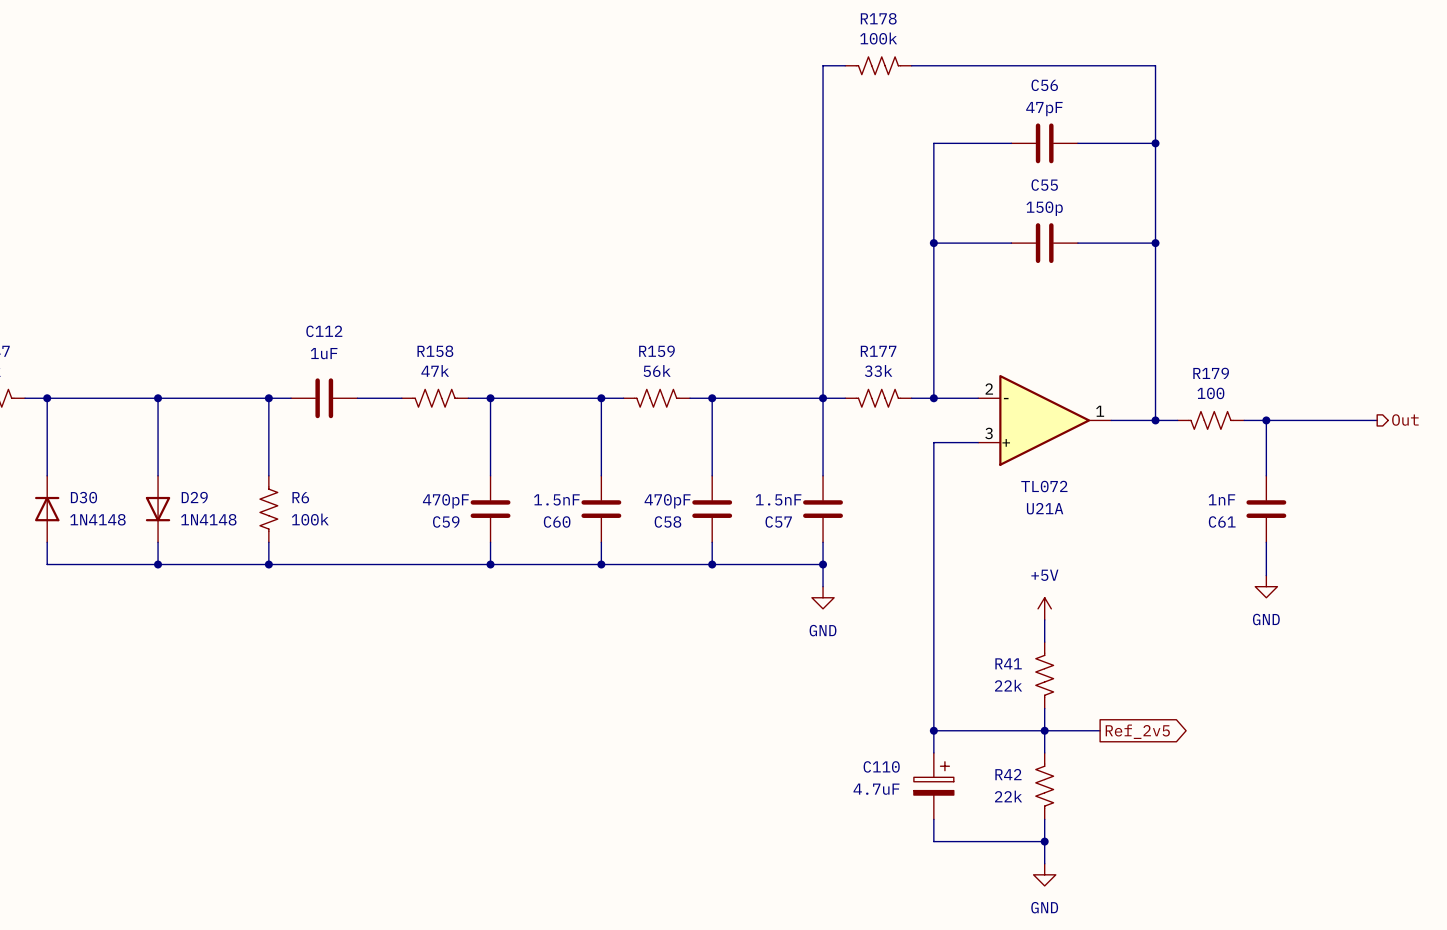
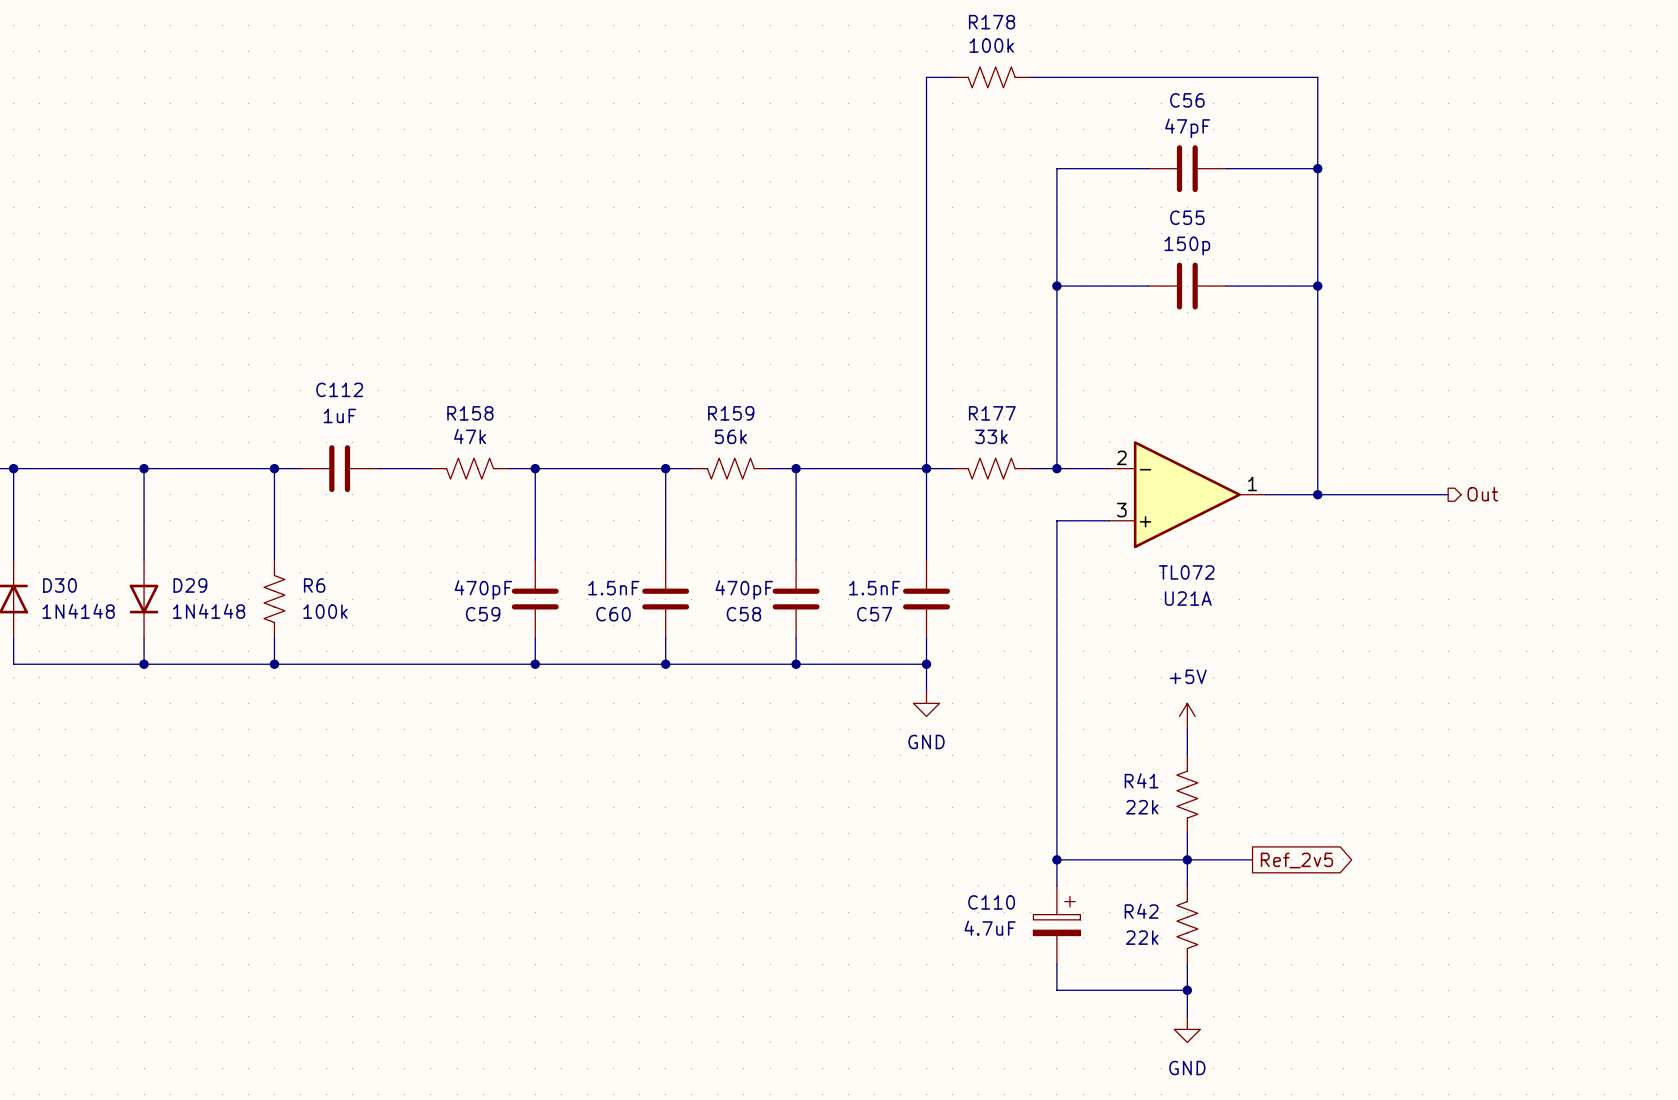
R179: 100 (1210, 420) -> none
junction: (1266, 420) -> none
wire: (1377, 420) (1266, 420) (1266, 475) -> none
hierarchical label position: Out (1405, 420) -> Out (1482, 494)
C61: 1nF (1266, 509) -> none
wire: (1266, 542) (1266, 575) -> none
power symbol: GND (1266, 586) -> none

